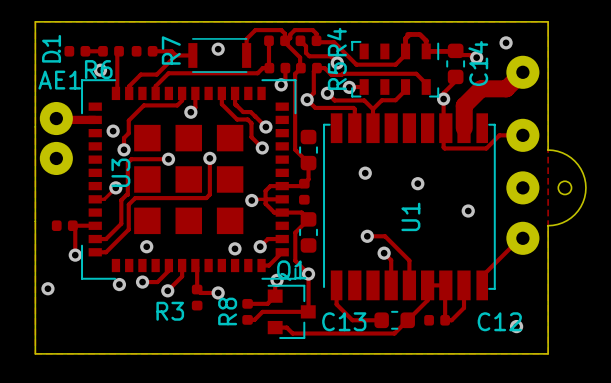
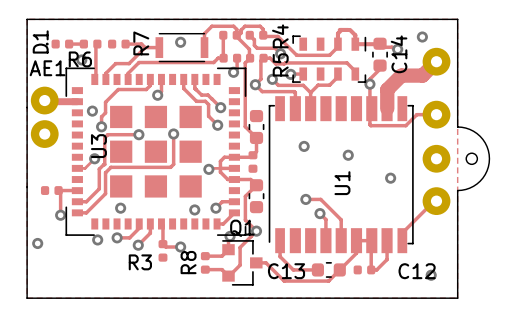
track: (308, 274) (308, 311) (262, 311) (254, 319) -> (256, 231) (240, 247) (240, 265) (229, 276)
track: none -> (211, 269) (222, 269) (228, 276)
track: (276, 327) (286, 327) (292, 333) (341, 333) -> (256, 262) (266, 262) (284, 281)

